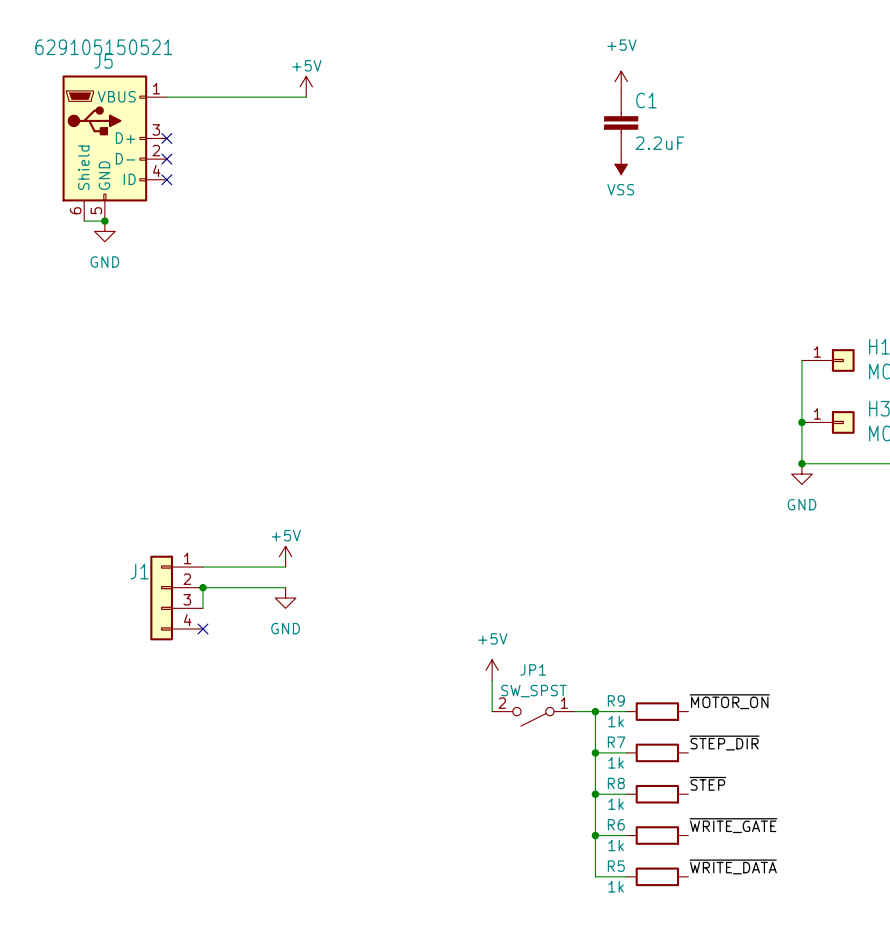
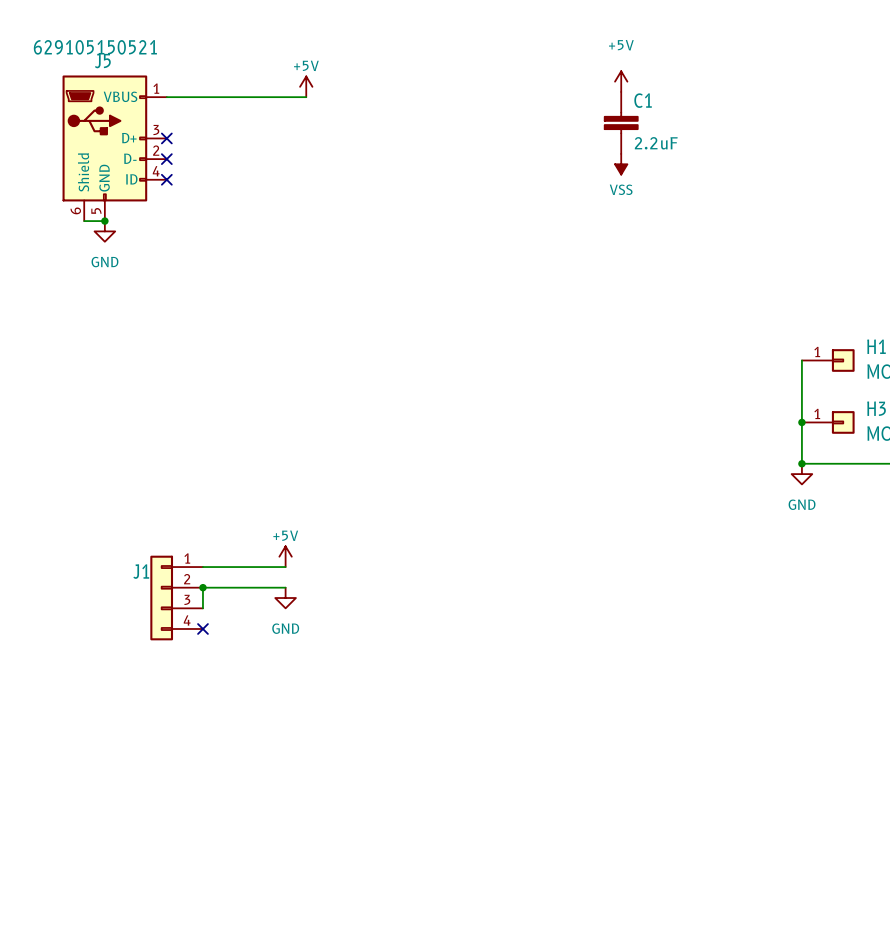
power symbol: +5V (492, 670) -> none
wire: (492, 680) (492, 711) -> none
label: ~{MOTOR_ON} (729, 701) -> none
wire: (574, 711) (626, 711) -> none
wire: (595, 711) (595, 876) (626, 876) -> none
junction: (595, 711) -> none
R9: 1k (657, 711) -> none
JP1: SW_SPST (533, 716) -> none
label: ~{STEP_DIR} (724, 743) -> none
wire: (595, 752) (626, 752) -> none
junction: (595, 752) -> none
R7: 1k (657, 752) -> none
label: ~{STEP} (707, 783) -> none
wire: (595, 794) (626, 794) -> none
junction: (595, 794) -> none
R8: 1k (657, 794) -> none
label: ~{WRITE_GATE} (733, 825) -> none
wire: (595, 835) (626, 835) -> none
junction: (595, 835) -> none
R6: 1k (657, 835) -> none
label: ~{WRITE_DATA} (733, 866) -> none
R5: 1k (657, 876) -> none

